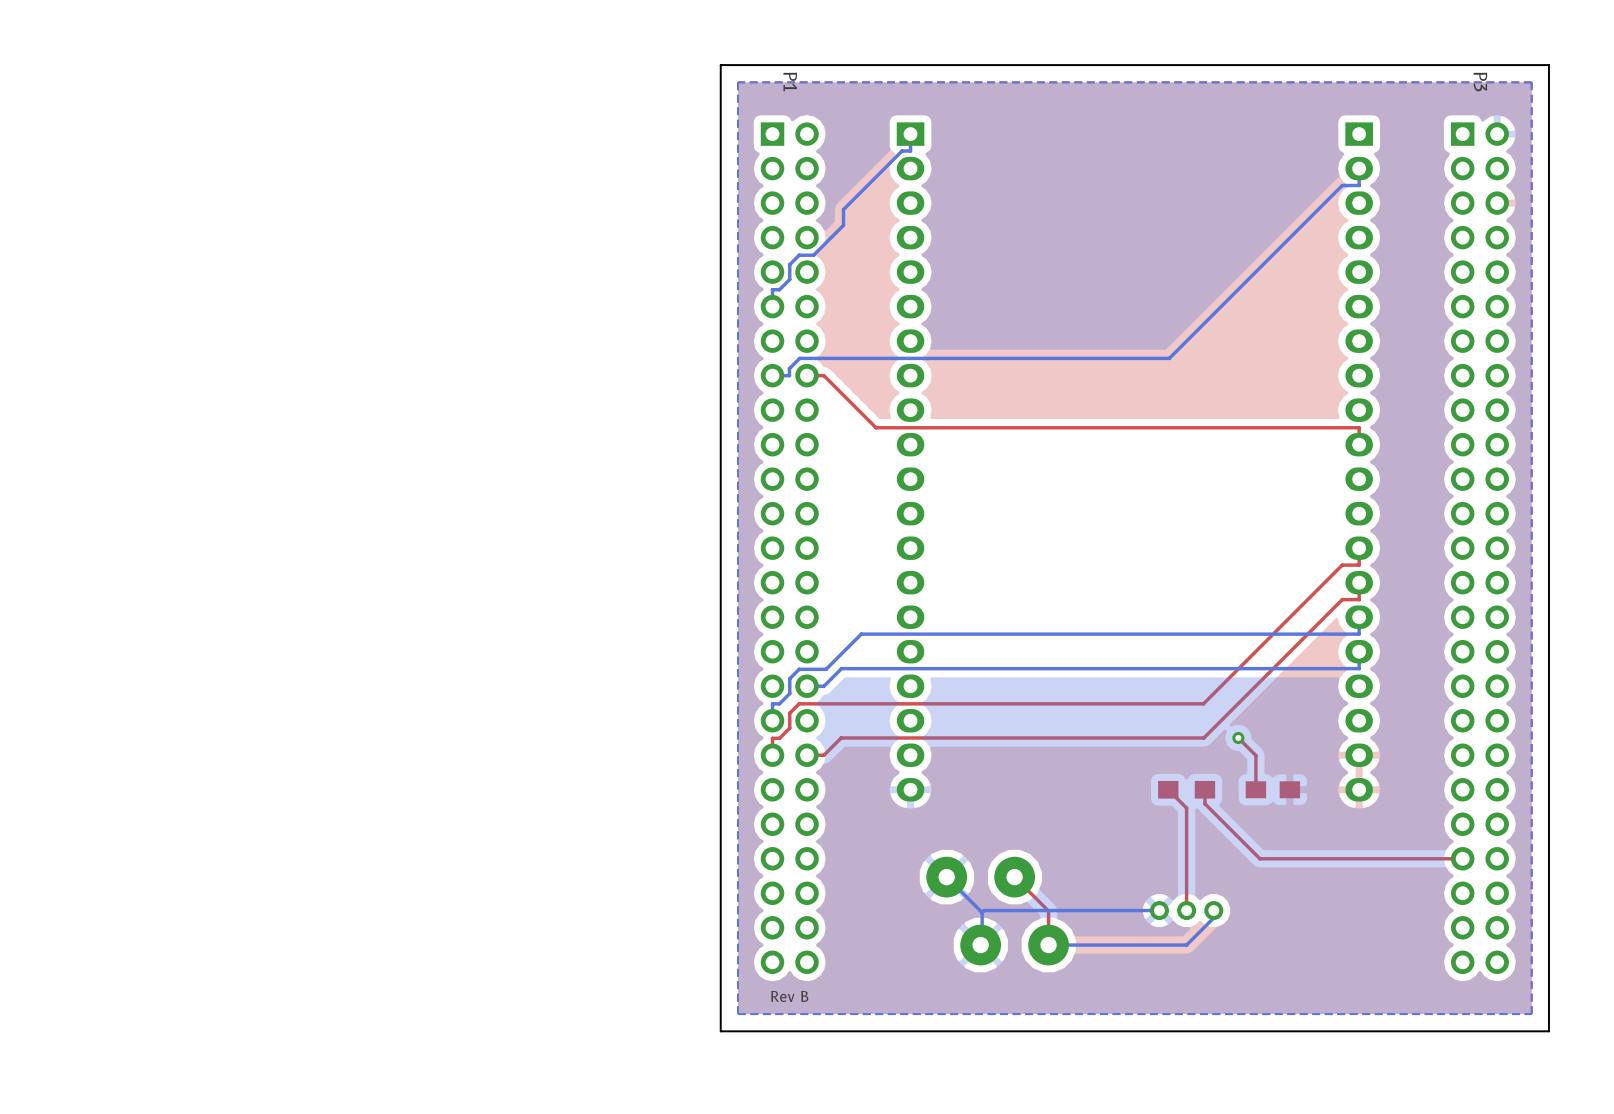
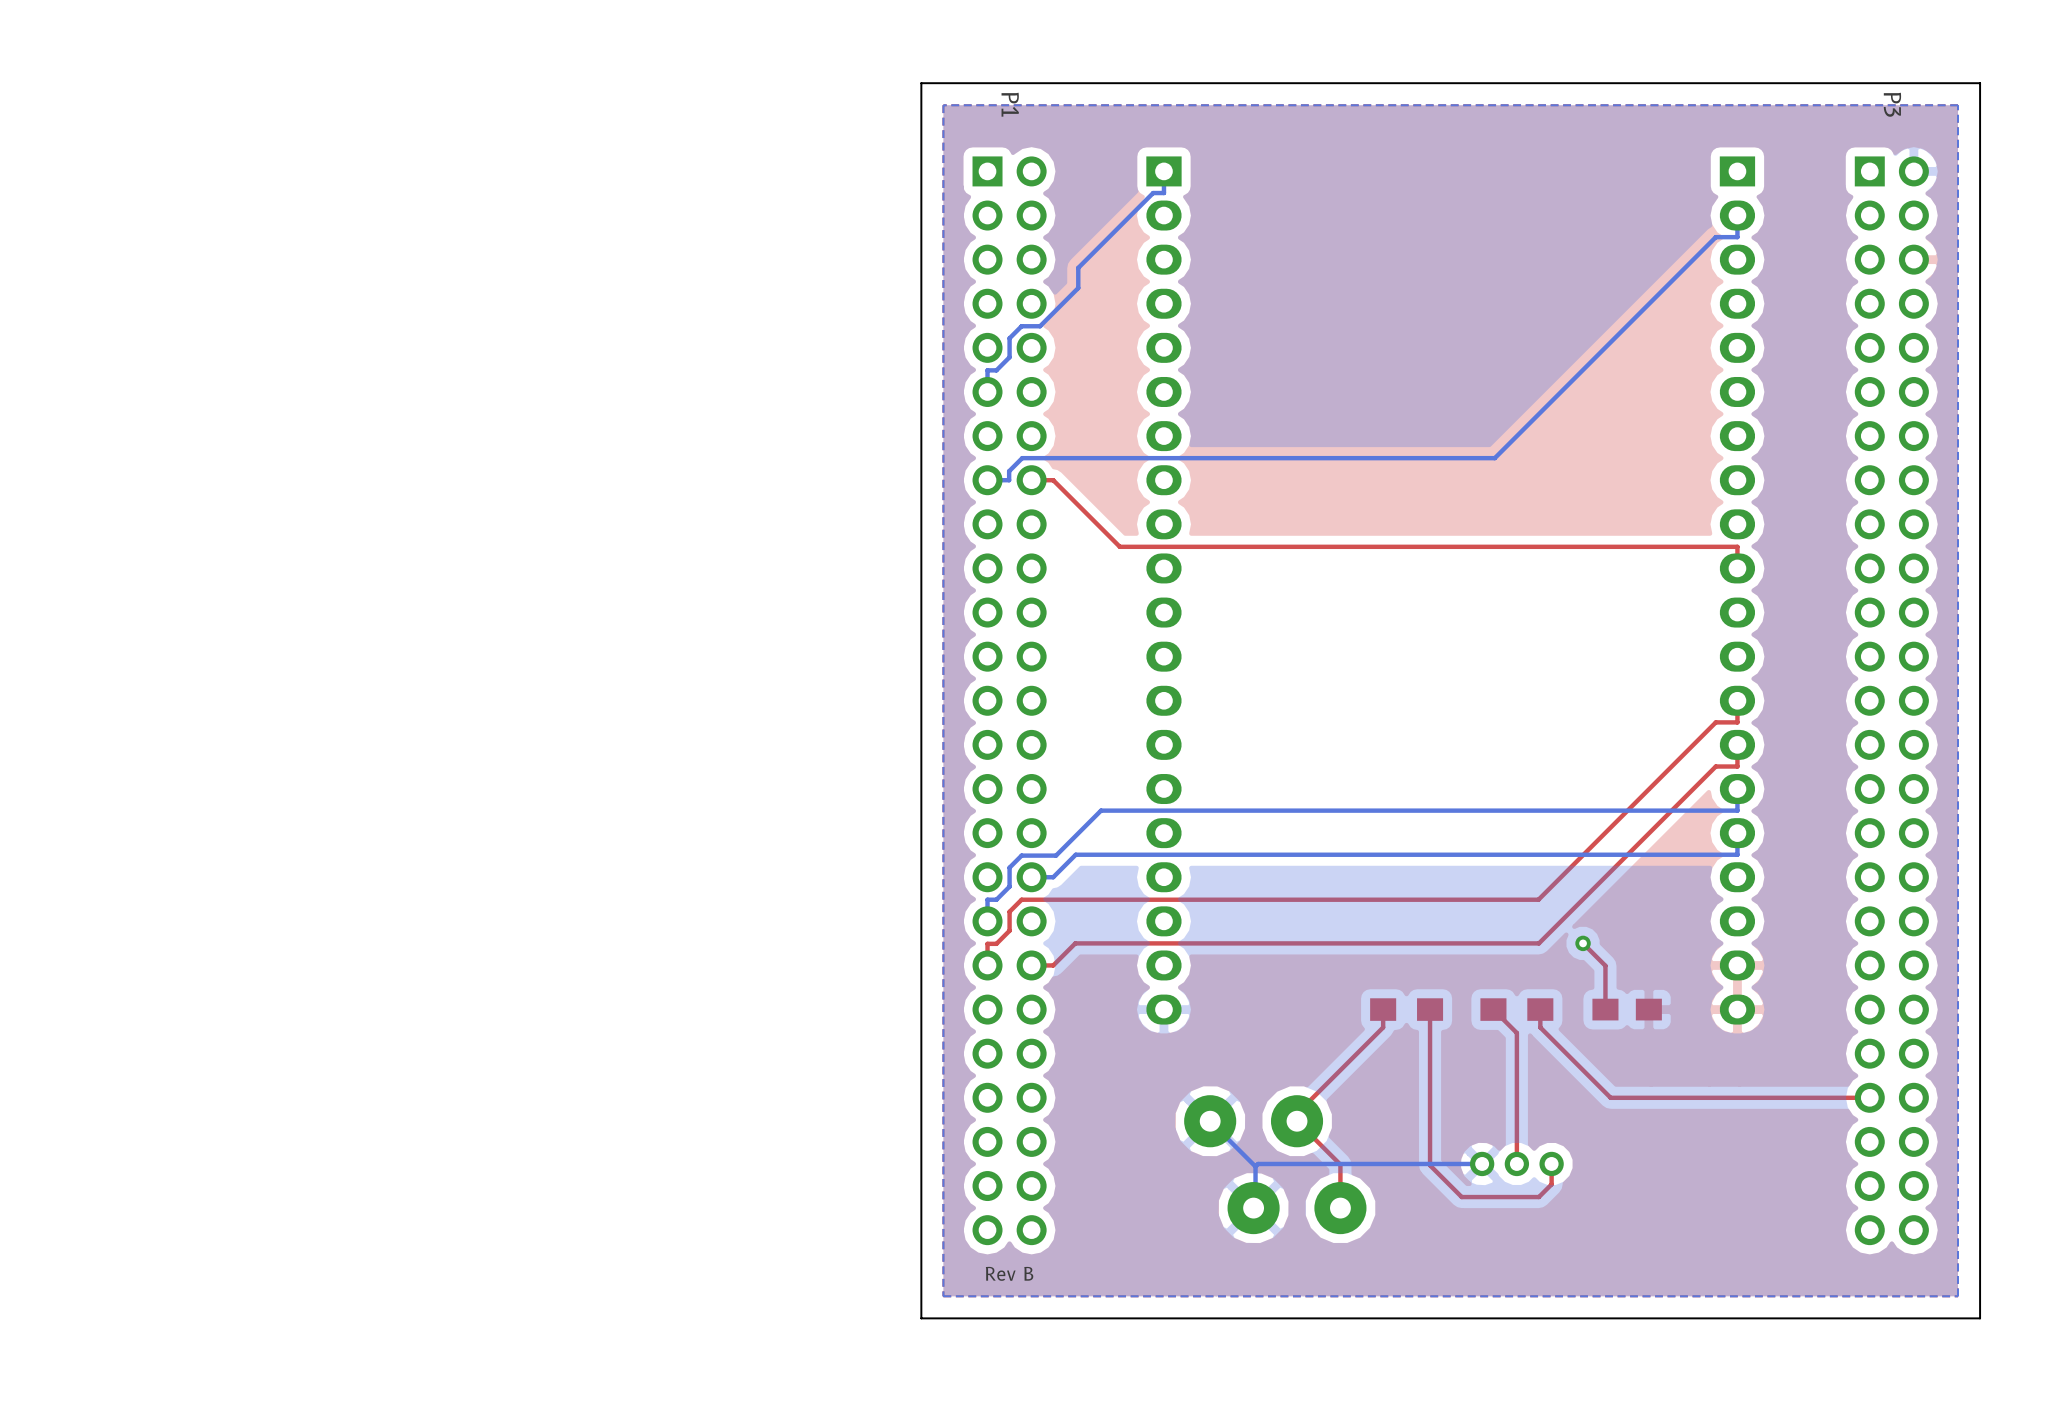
top track: none -> (1383, 1009) (1383, 1027) (1297, 1113)
part: none -> (1406, 1009)
top track: none -> (1430, 1009) (1430, 1165) (1461, 1197) (1538, 1197) (1551, 1184) (1551, 1163)
bottom track: (1213, 910) (1213, 917) (1186, 945) (1048, 945) -> none

